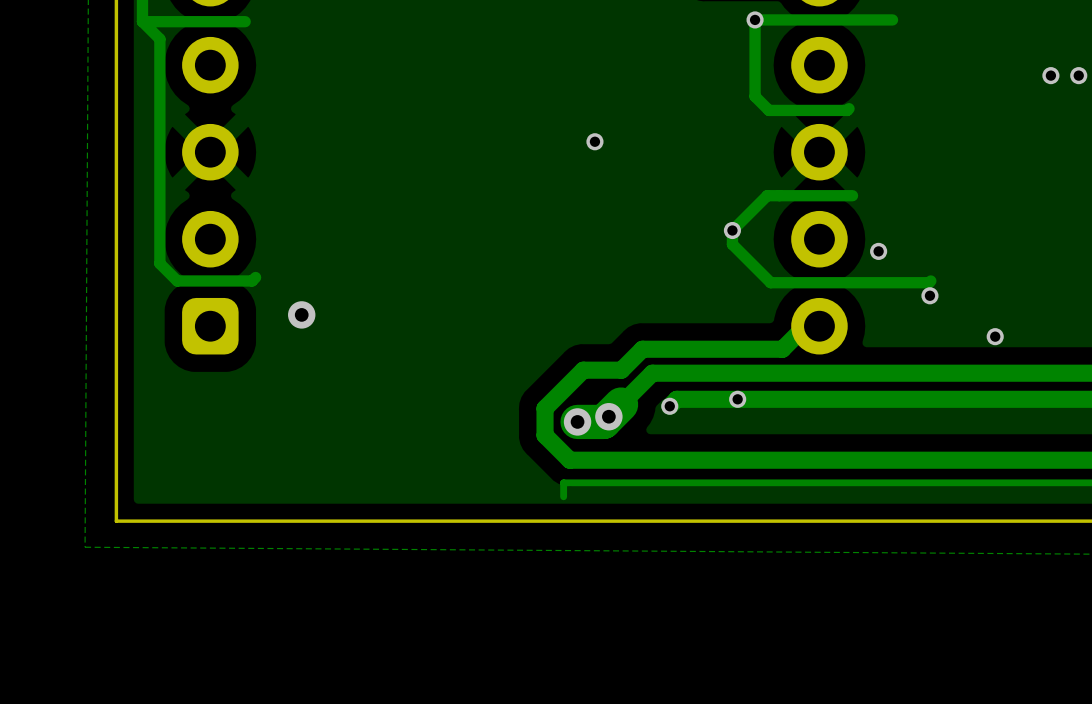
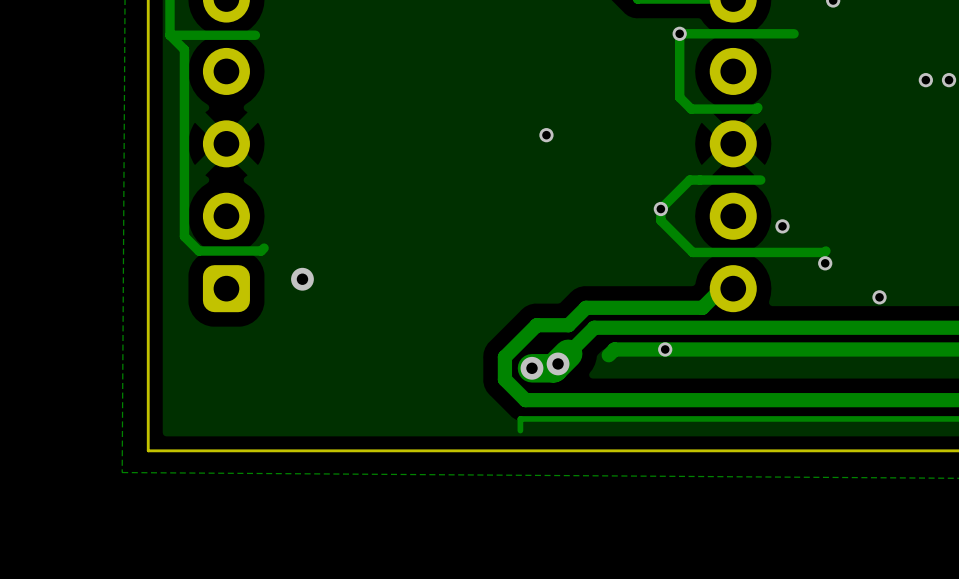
via: (669, 406) -> none

